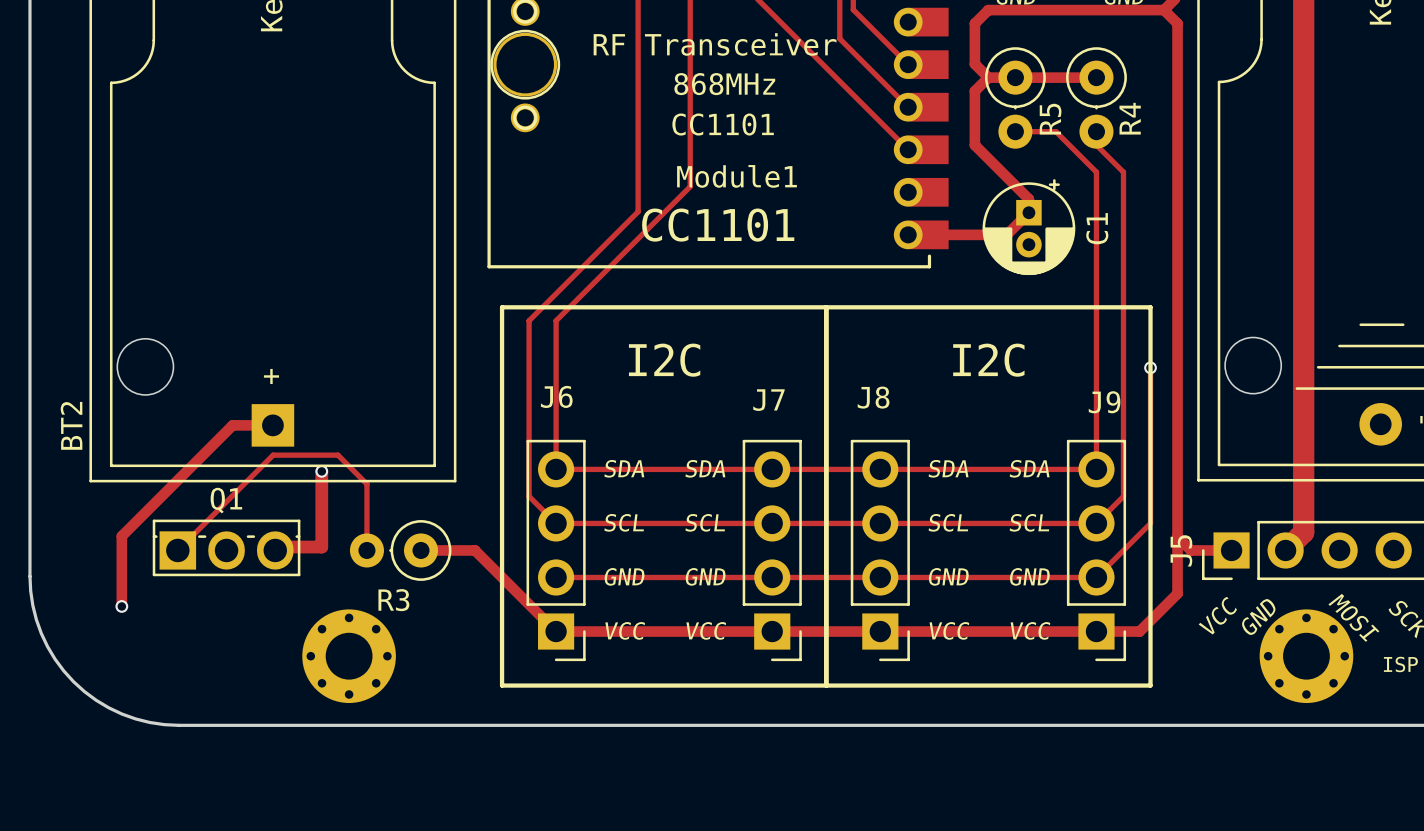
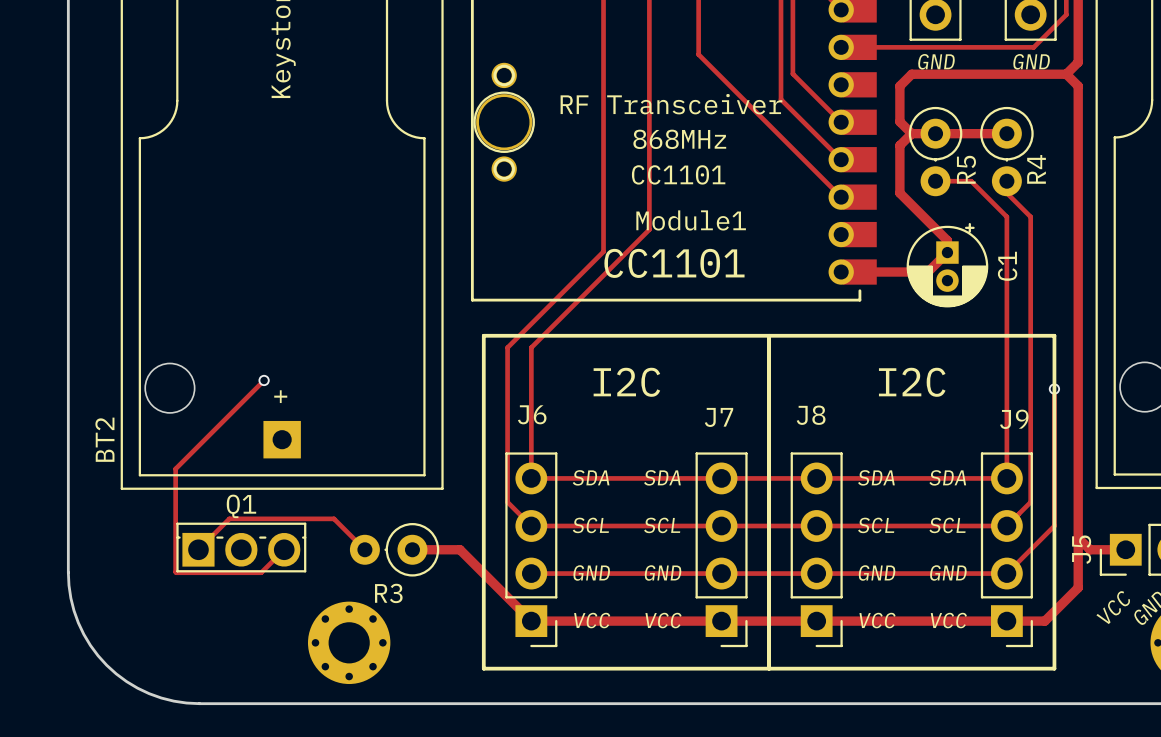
track: none -> (264, 380) (175, 468) (175, 572) (261, 572) (284, 549)
via: none -> (264, 380)
track: (272, 425) (232, 425) (121, 536) (121, 606) -> none
track: (321, 471) (321, 547) (278, 547) -> none
via: (321, 471) -> none
track: (212, 515) (273, 455) (337, 455) (366, 484) (366, 550) -> (229, 518) (334, 518) (364, 549)
via: (121, 606) -> none

